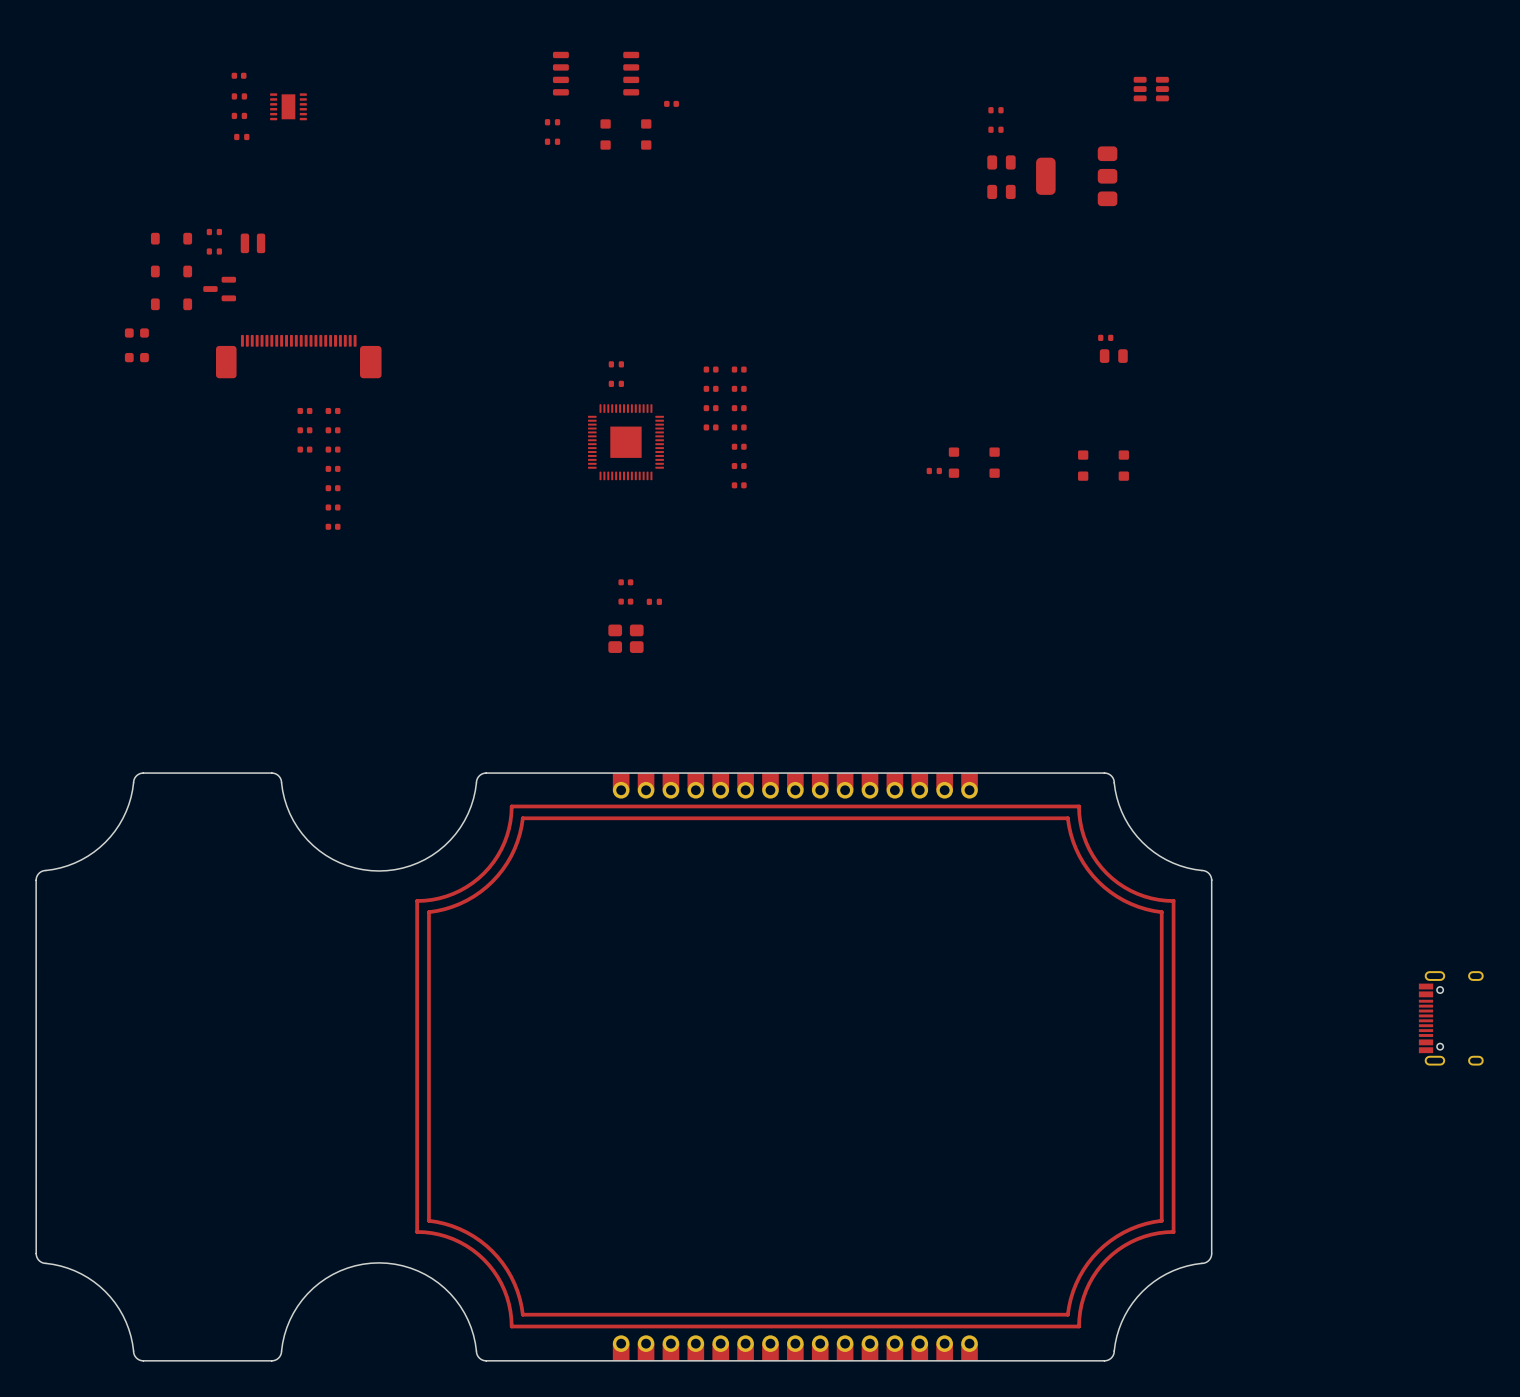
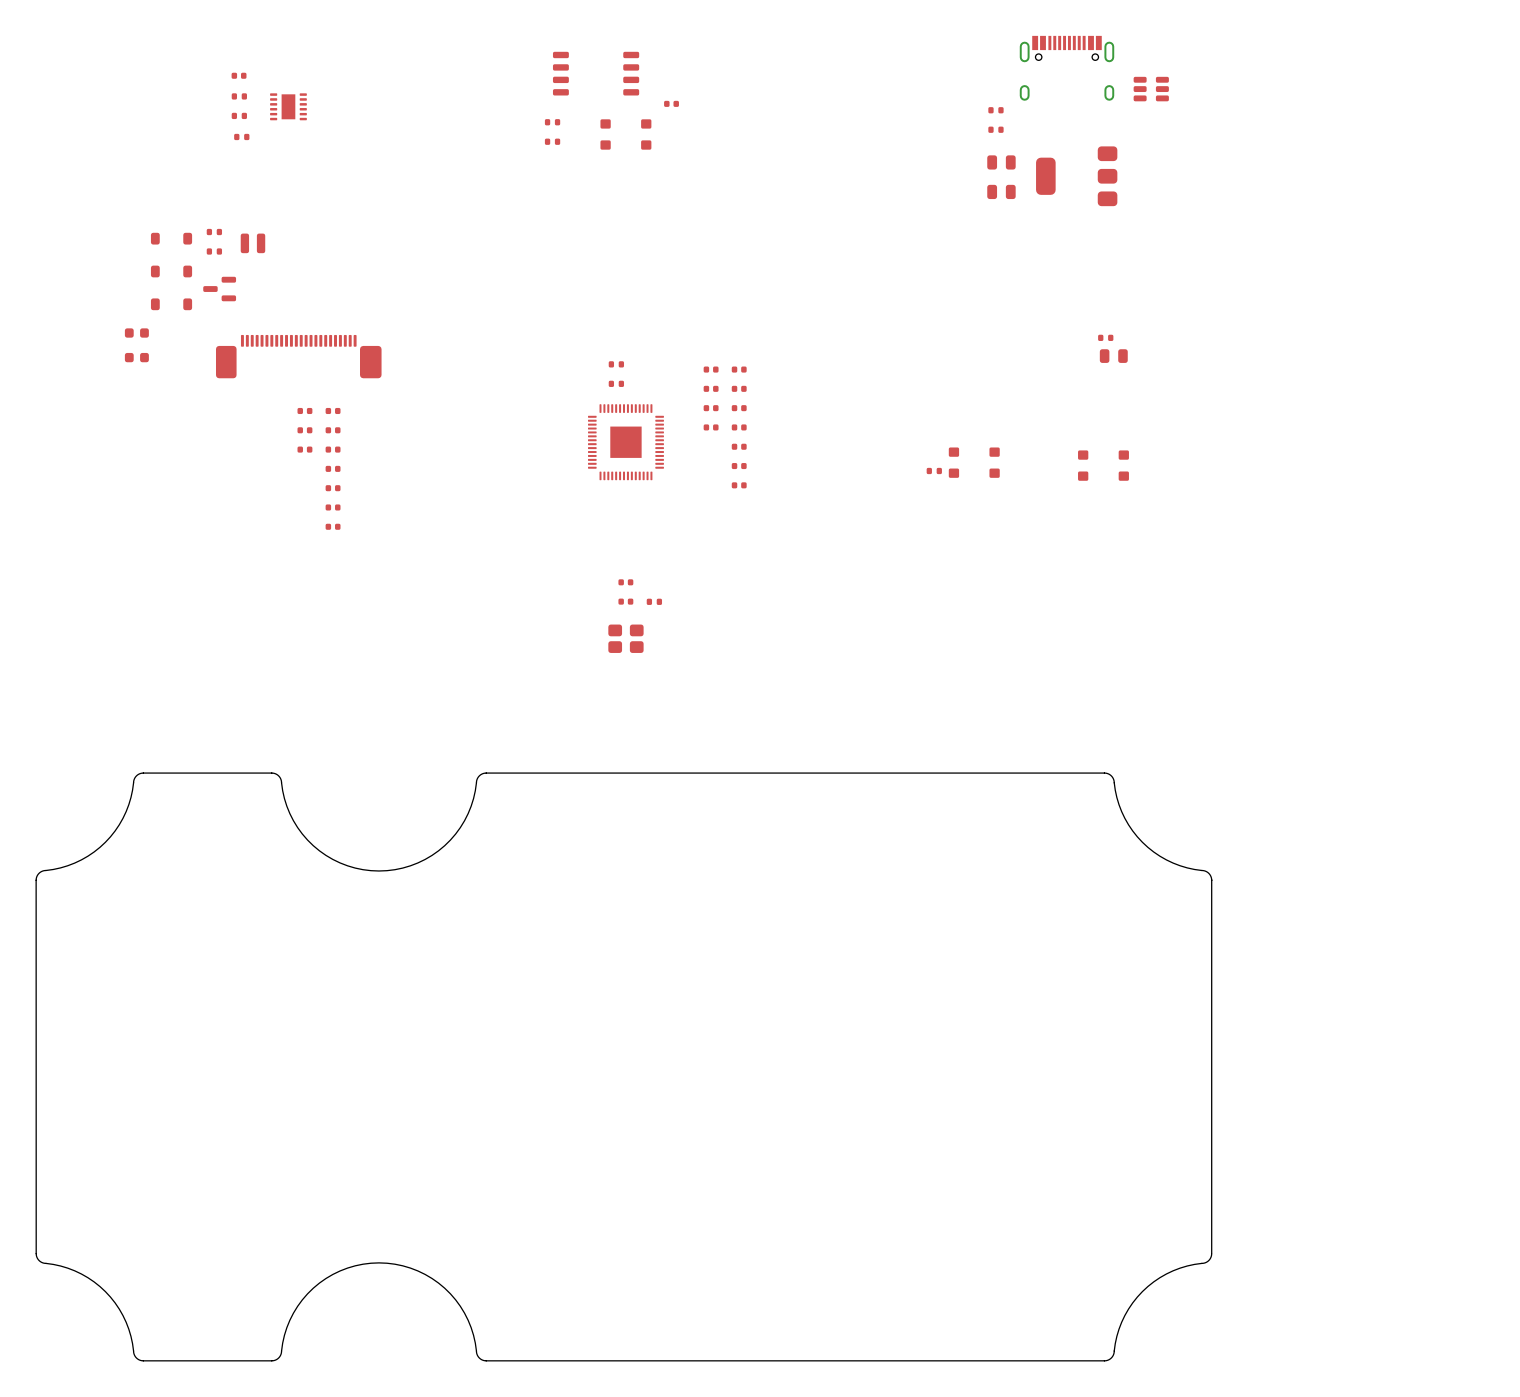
part: none -> (1066, 68)
part: (795, 785) -> none
top track: (1079, 806) (511, 806) (510, 821) (504, 842) (497, 855) (483, 873) (466, 887) (453, 893) (431, 899) (417, 901) (417, 1231) (431, 1233) (453, 1239) (466, 1245) (483, 1259) (497, 1277) (504, 1290) (509, 1304) (511, 1326) (1079, 1326) (1081, 1304) (1086, 1290) (1092, 1277) (1106, 1259) (1117, 1250) (1137, 1239) (1158, 1233) (1173, 1231) (1173, 901) (1158, 899) (1137, 893) (1124, 887) (1106, 873) (1092, 855) (1086, 842) (1080, 821) (1079, 806) -> none
top track: (1067, 818) (522, 818) (514, 848) (502, 869) (492, 881) (466, 900) (444, 909) (428, 912) (428, 1220) (459, 1228) (480, 1240) (492, 1251) (511, 1276) (519, 1299) (522, 1314) (1067, 1314) (1076, 1284) (1087, 1263) (1098, 1251) (1116, 1236) (1131, 1228) (1161, 1220) (1161, 912) (1138, 906) (1123, 900) (1098, 881) (1079, 856) (1073, 841) (1067, 818) -> none
part: (1451, 1018) -> none
part: (795, 1347) -> none

